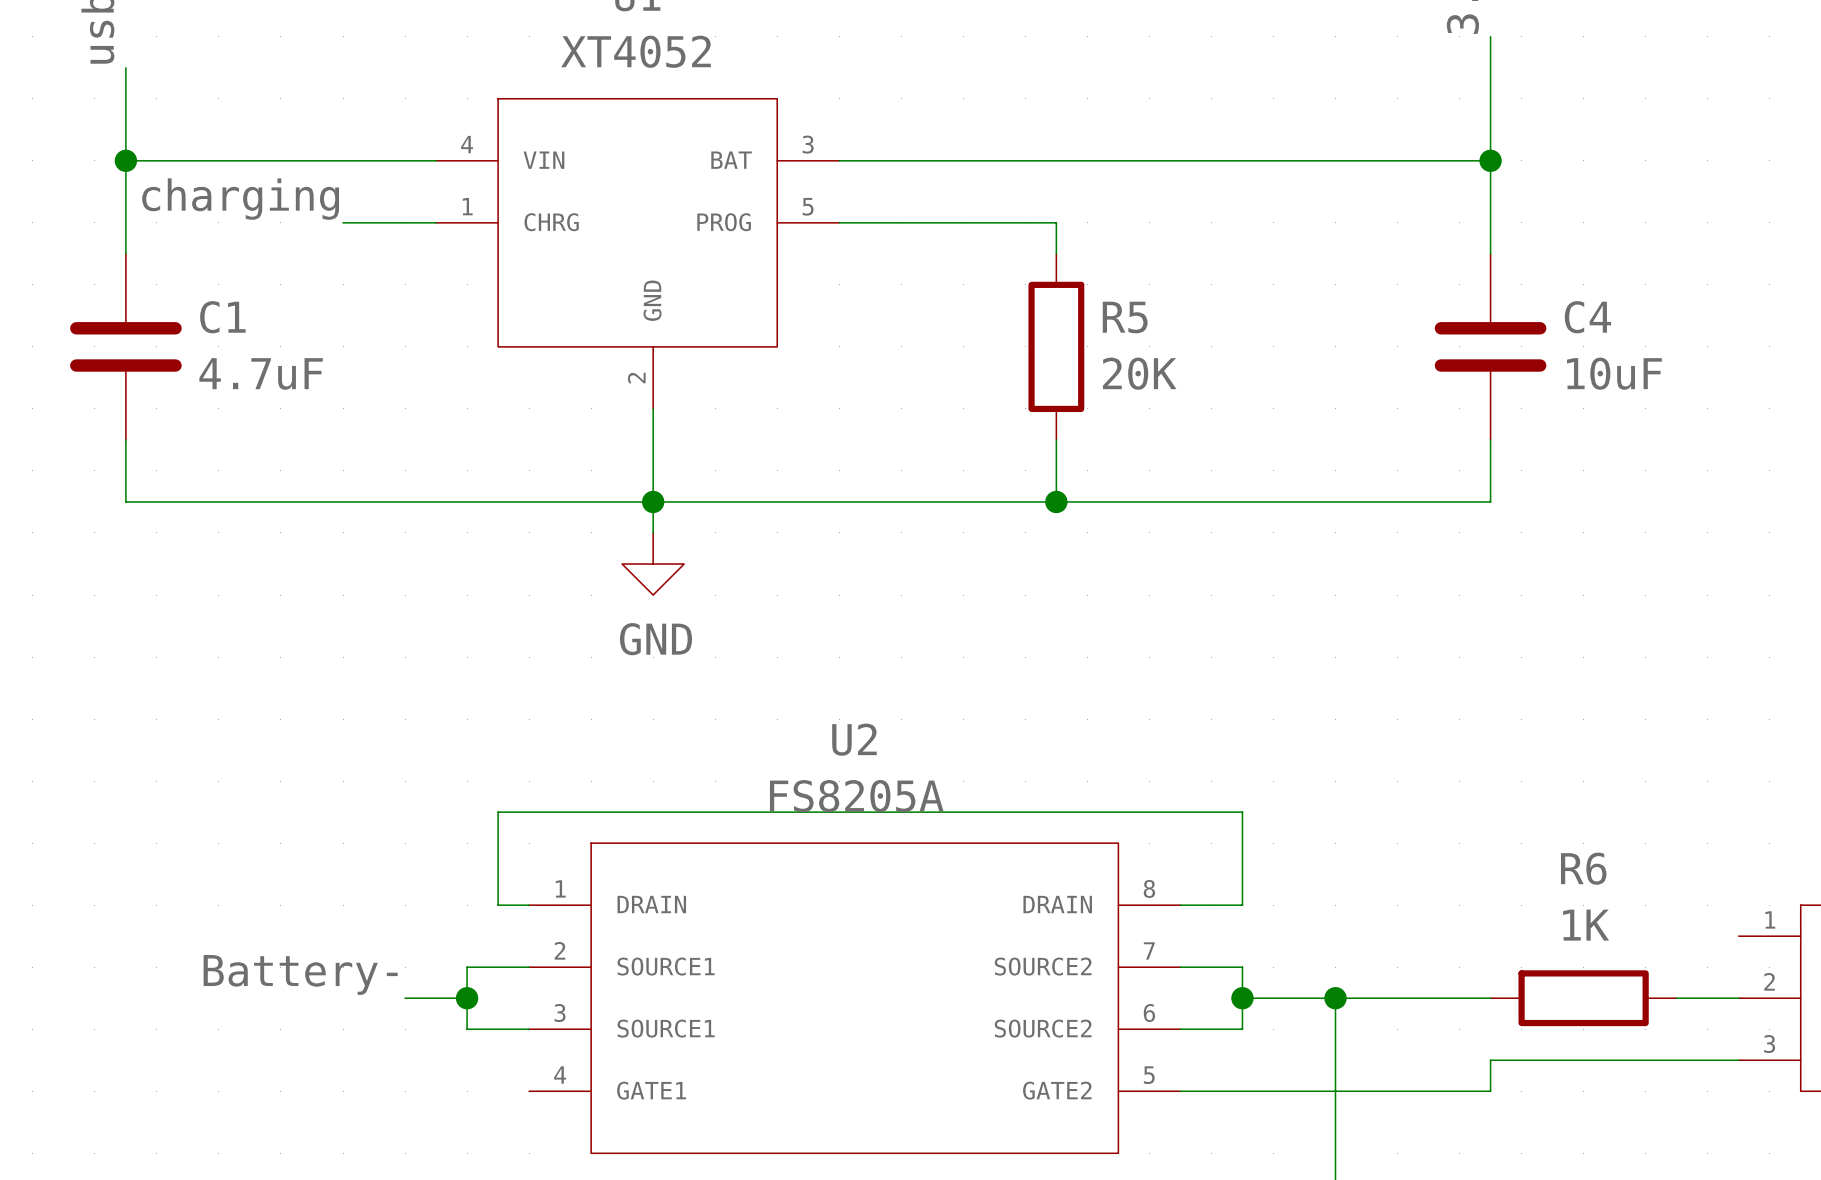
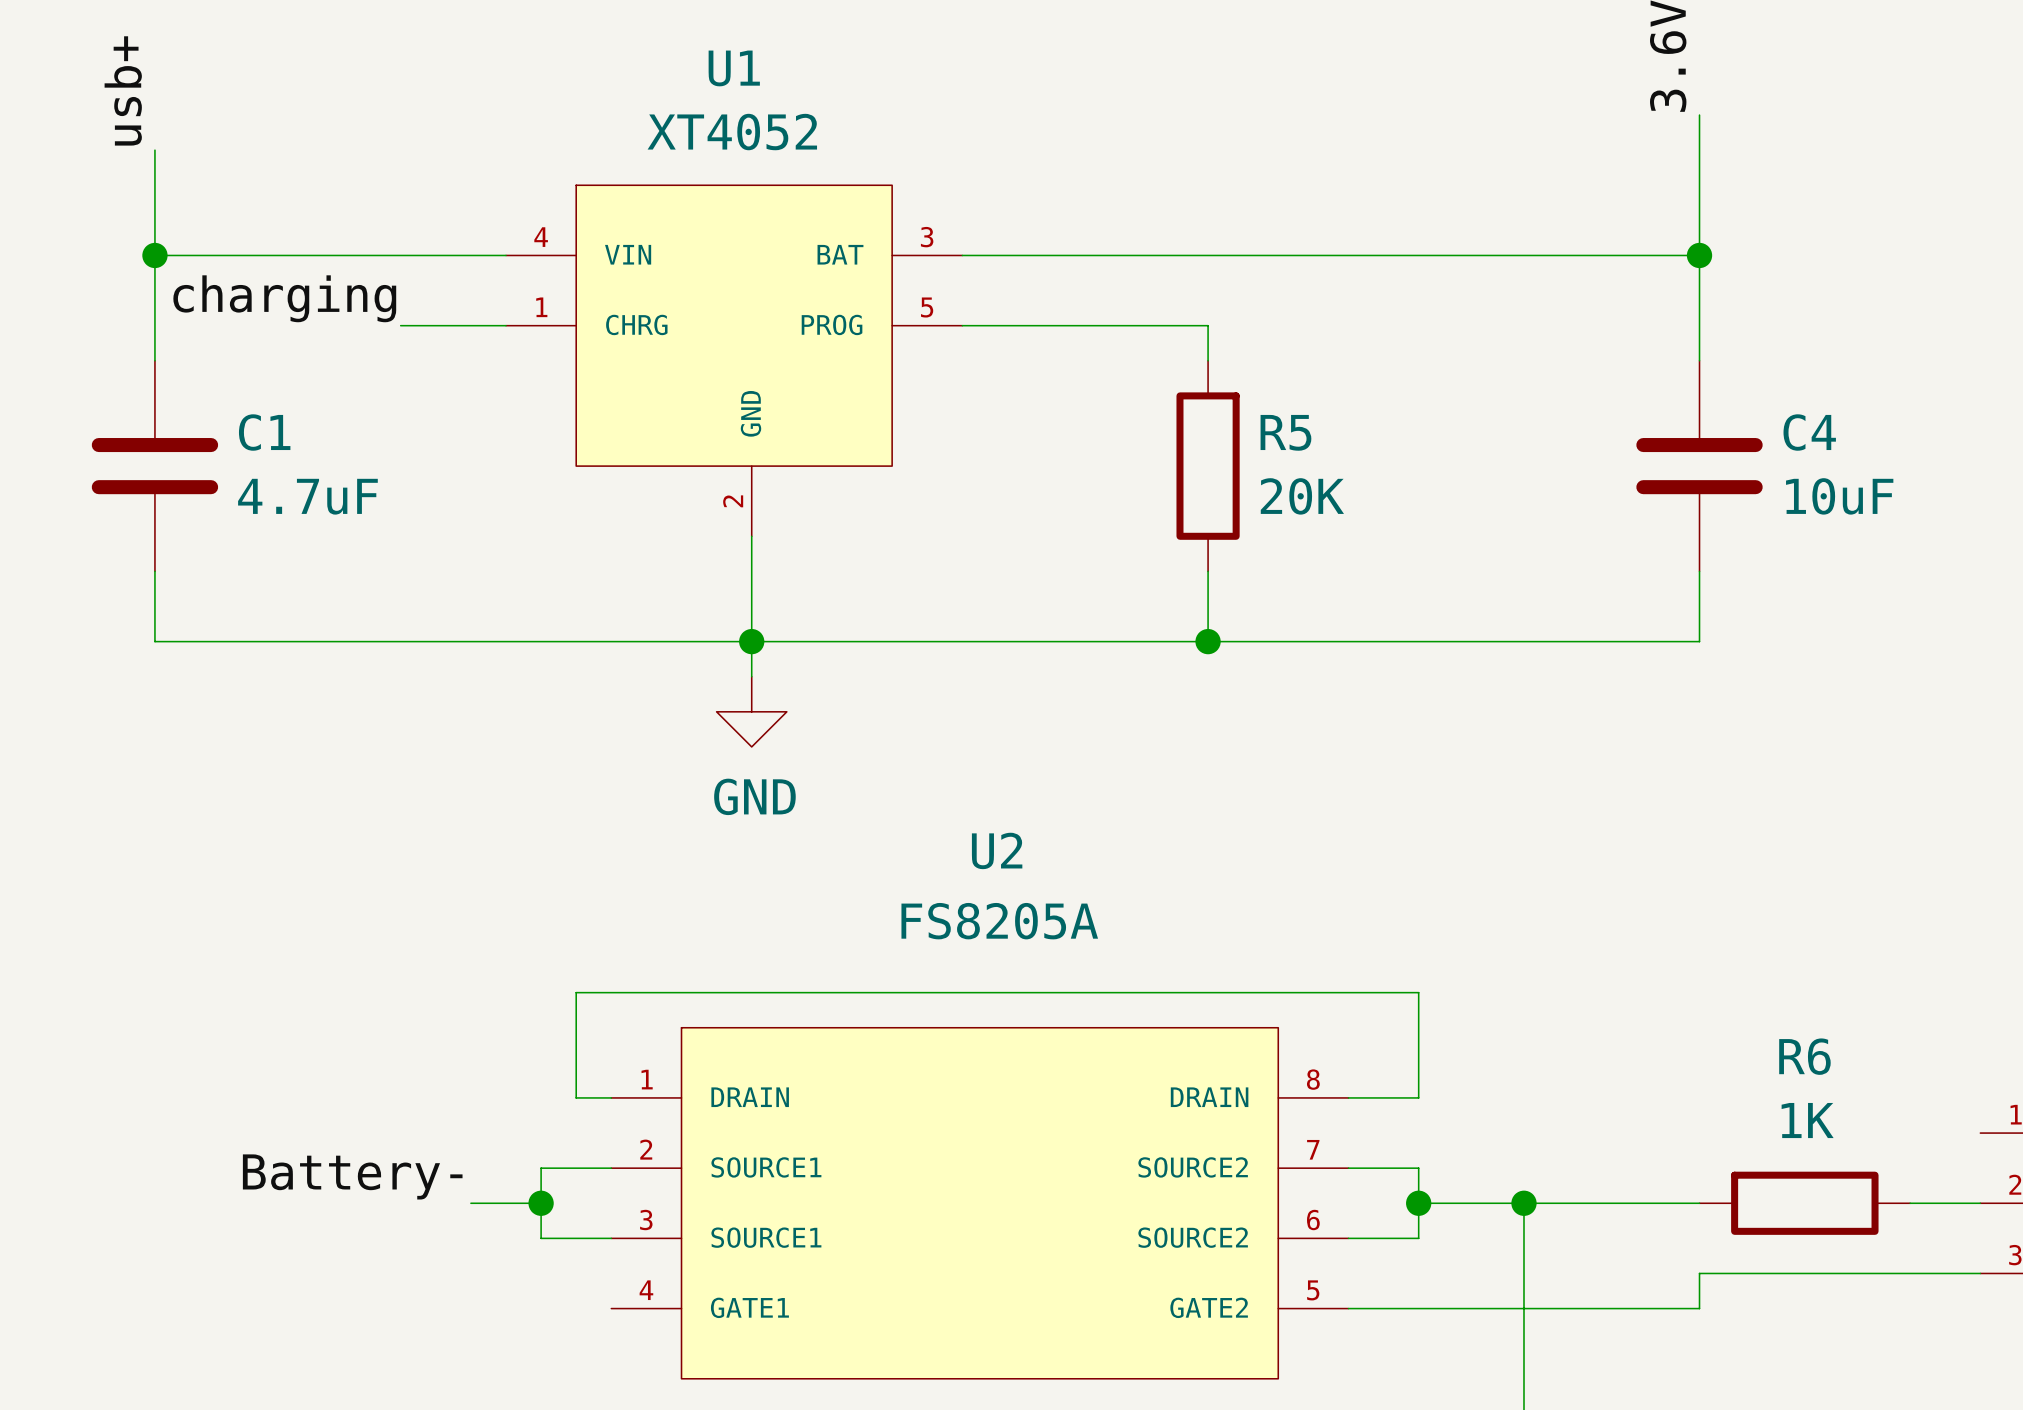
U2 name position: U2 (854, 739) -> U2 (997, 850)
U2 value position: FS8205A (856, 796) -> FS8205A (999, 921)

